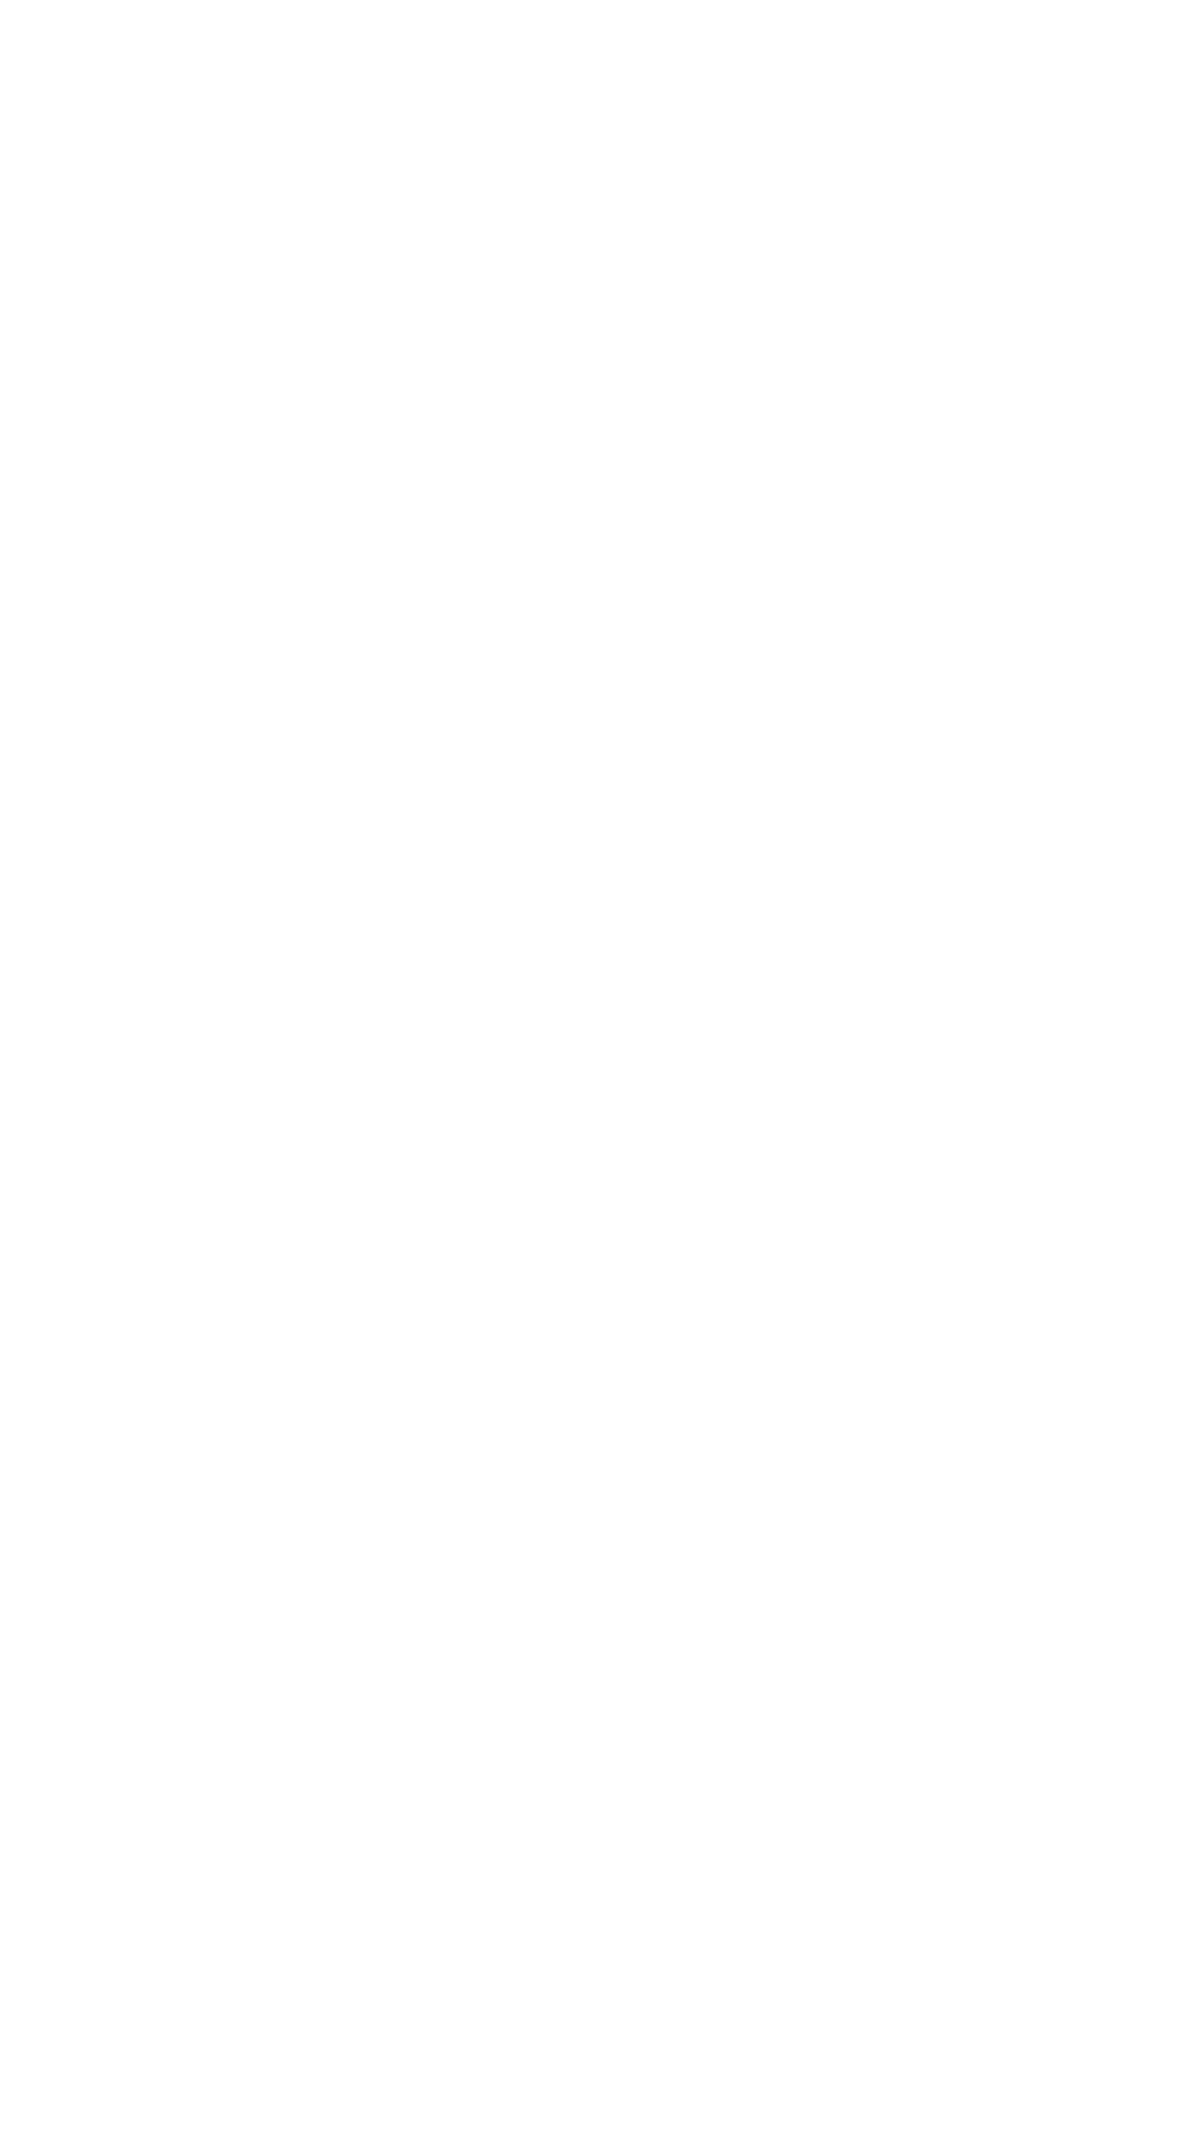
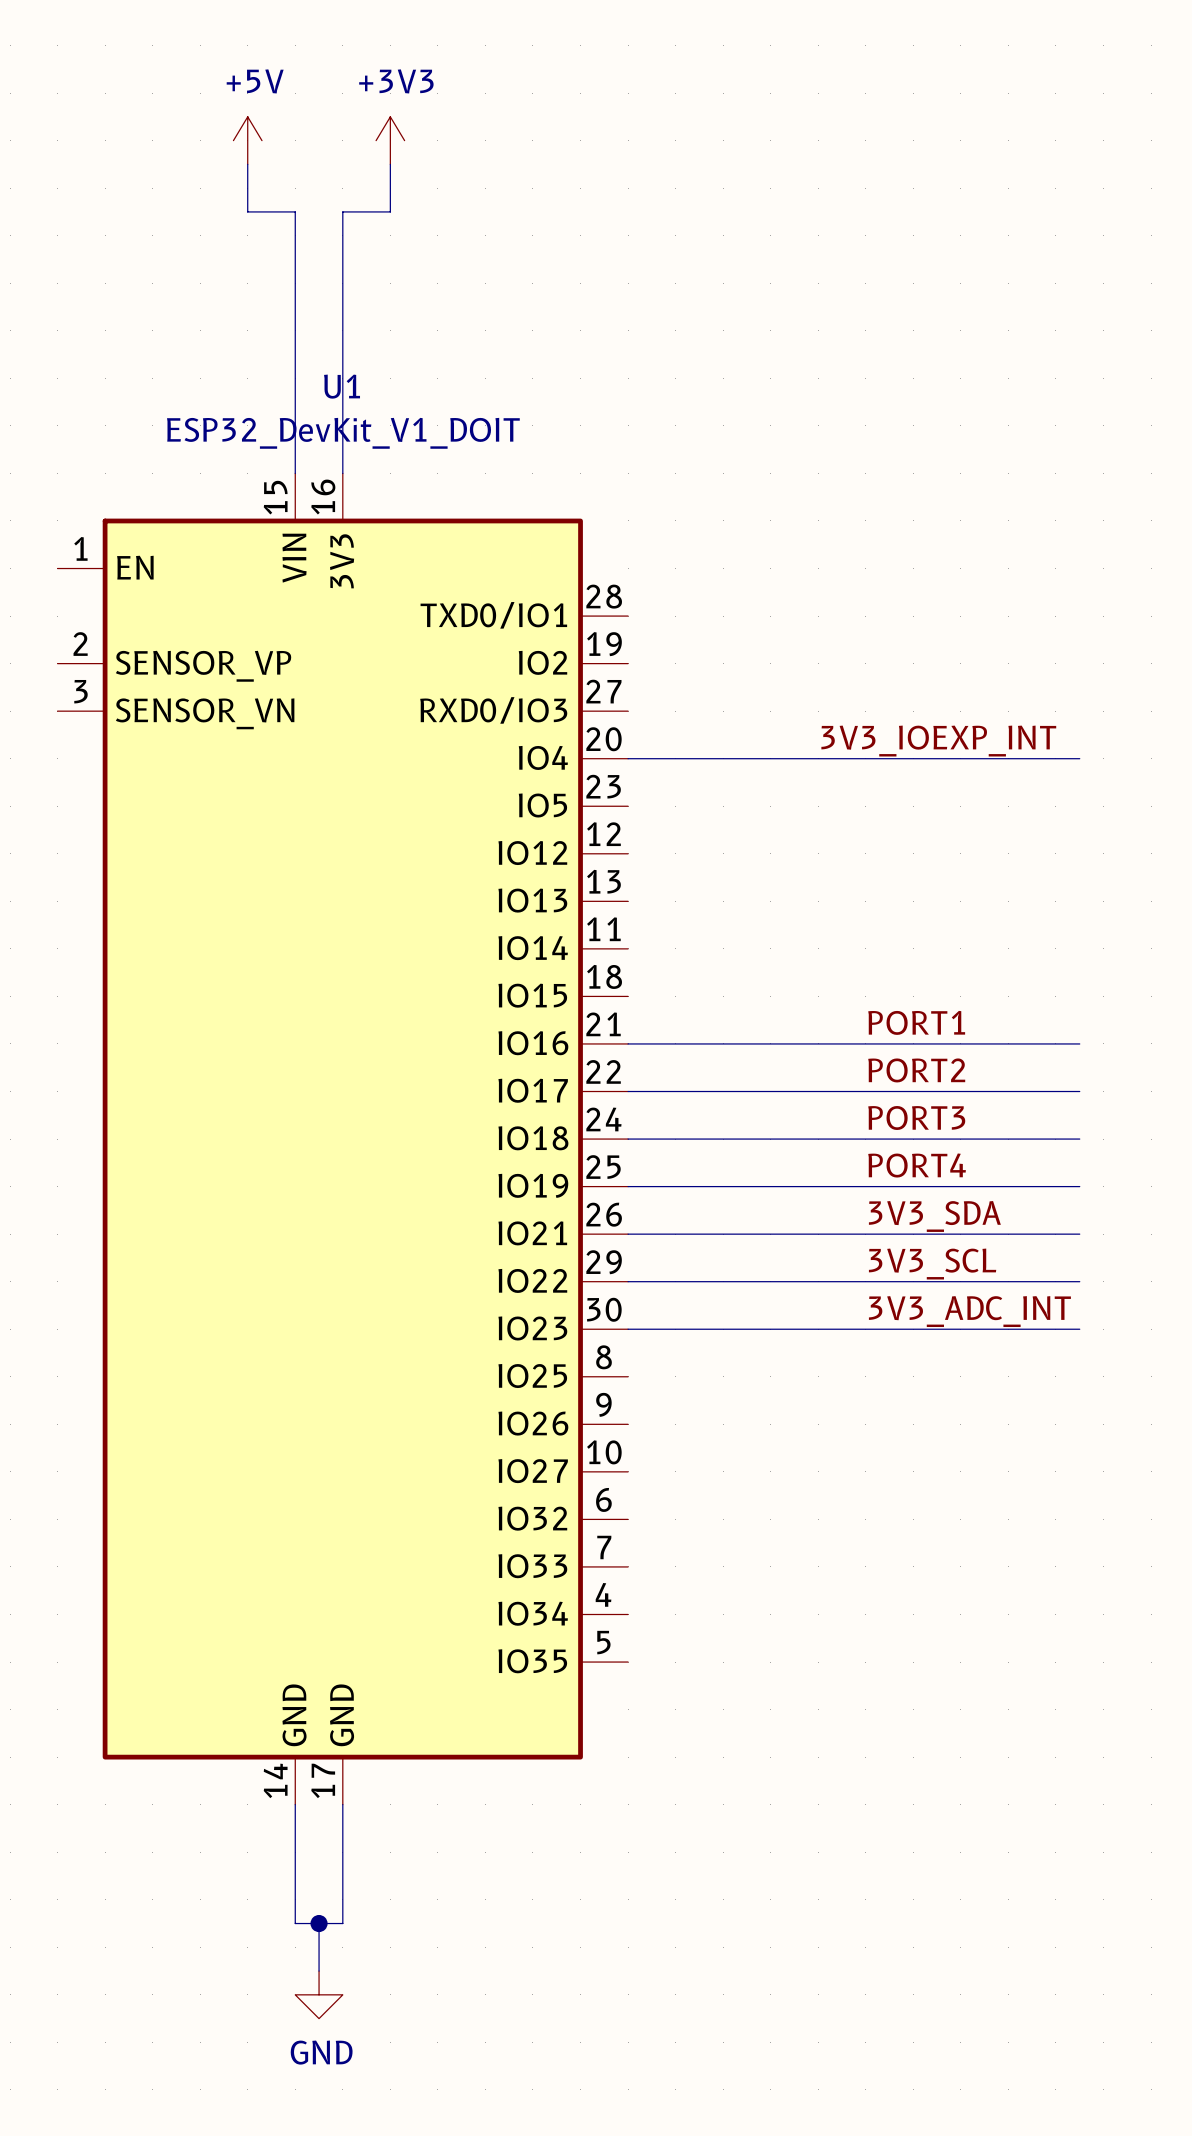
power symbol: none -> +5V (247, 140)
power symbol: none -> +3V3 (390, 140)
wire: none -> (247, 164) (247, 211) (295, 211) (295, 473)
wire: none -> (390, 164) (390, 211) (342, 211) (342, 473)
label: none -> 3V3_IOEXP_INT (938, 741)
wire: none -> (628, 758) (1079, 758)
label: none -> PORT1 (916, 1022)
wire: none -> (628, 1043) (1079, 1043)
label: none -> PORT2 (916, 1070)
wire: none -> (628, 1091) (1079, 1091)
label: none -> PORT3 (916, 1118)
U1: none -> ESP32_DevKit_V1_DOIT (342, 1139)
wire: none -> (628, 1139) (1079, 1139)
label: none -> PORT4 (917, 1165)
wire: none -> (628, 1186) (1079, 1186)
label: none -> 3V3_SDA (934, 1216)
wire: none -> (628, 1234) (1079, 1234)
label: none -> 3V3_SCL (932, 1264)
wire: none -> (628, 1281) (1079, 1281)
label: none -> 3V3_ADC_INT (969, 1311)
wire: none -> (628, 1329) (1079, 1329)
wire: none -> (295, 1804) (295, 1923) (342, 1923) (342, 1804)
wire: none -> (319, 1923) (319, 1971)
junction: none -> (319, 1923)
power symbol: none -> GND (319, 1994)

